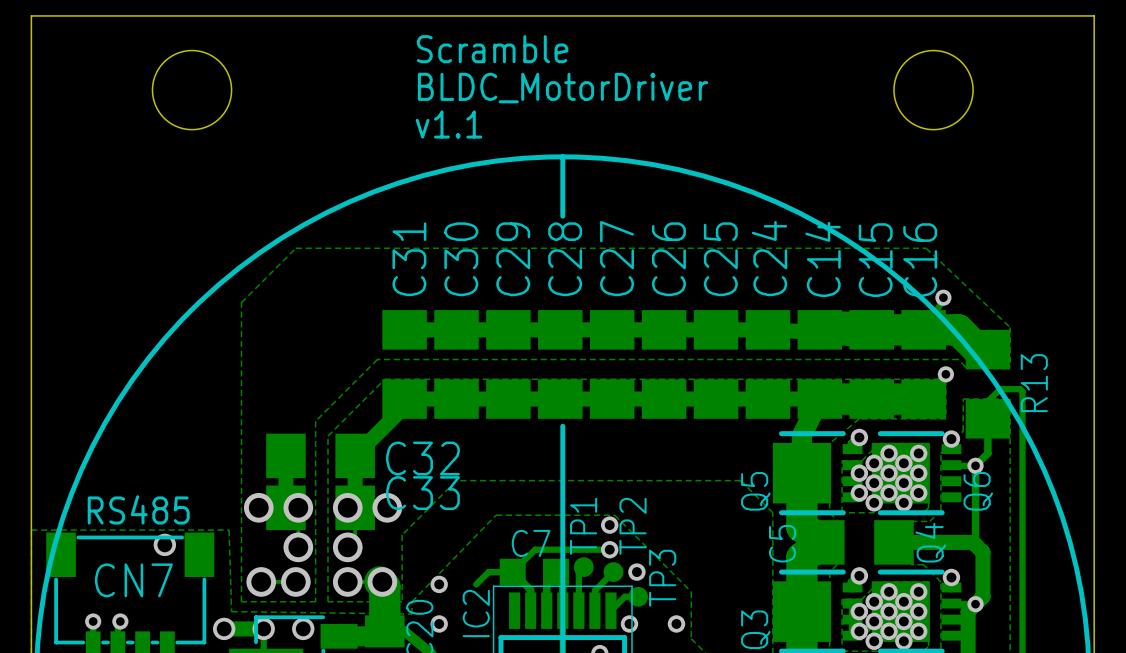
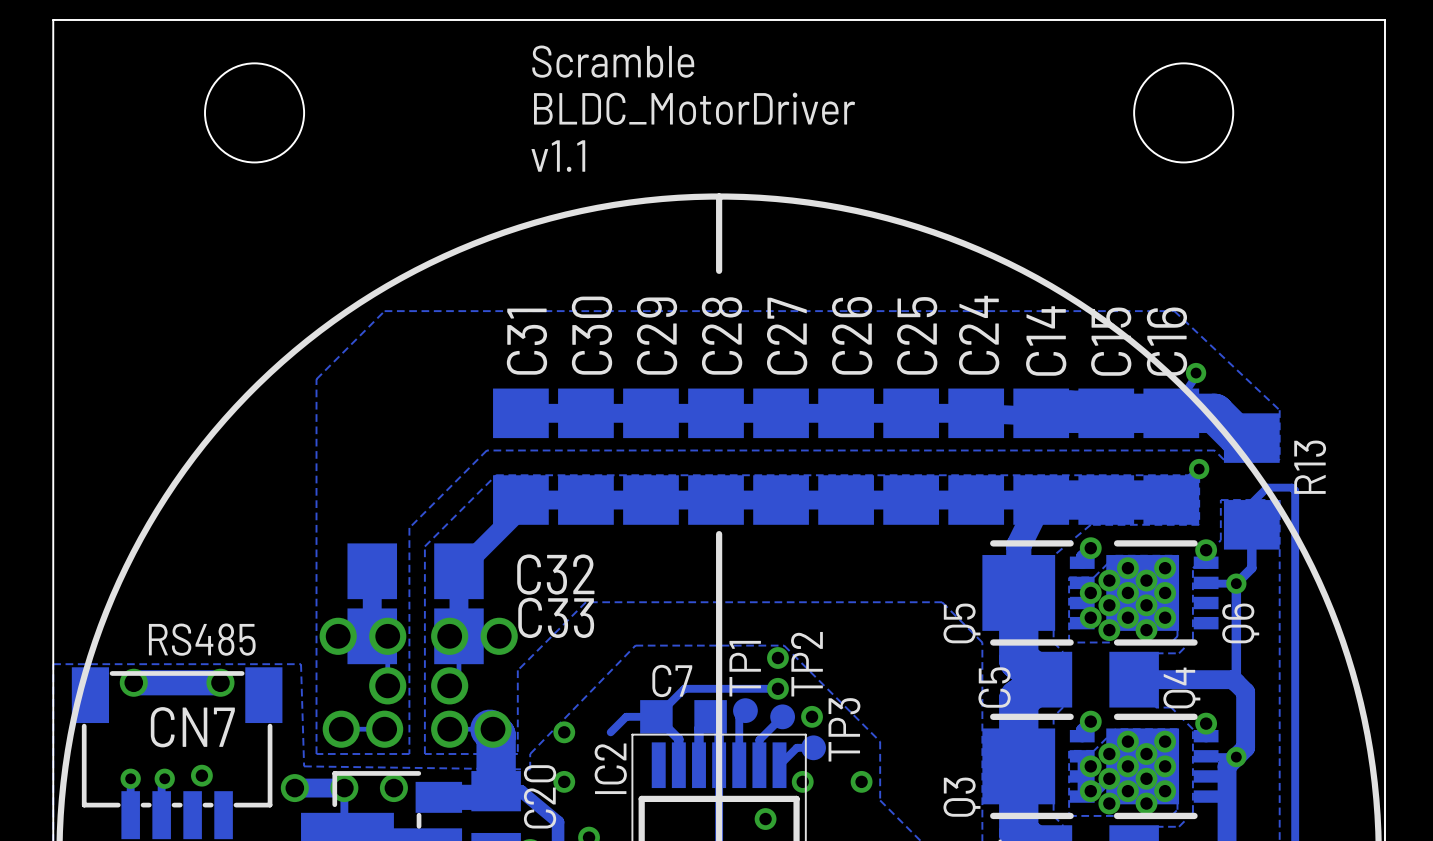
via: none -> (133, 682)
track: none -> (220, 682) (133, 682)
via: none -> (201, 775)

